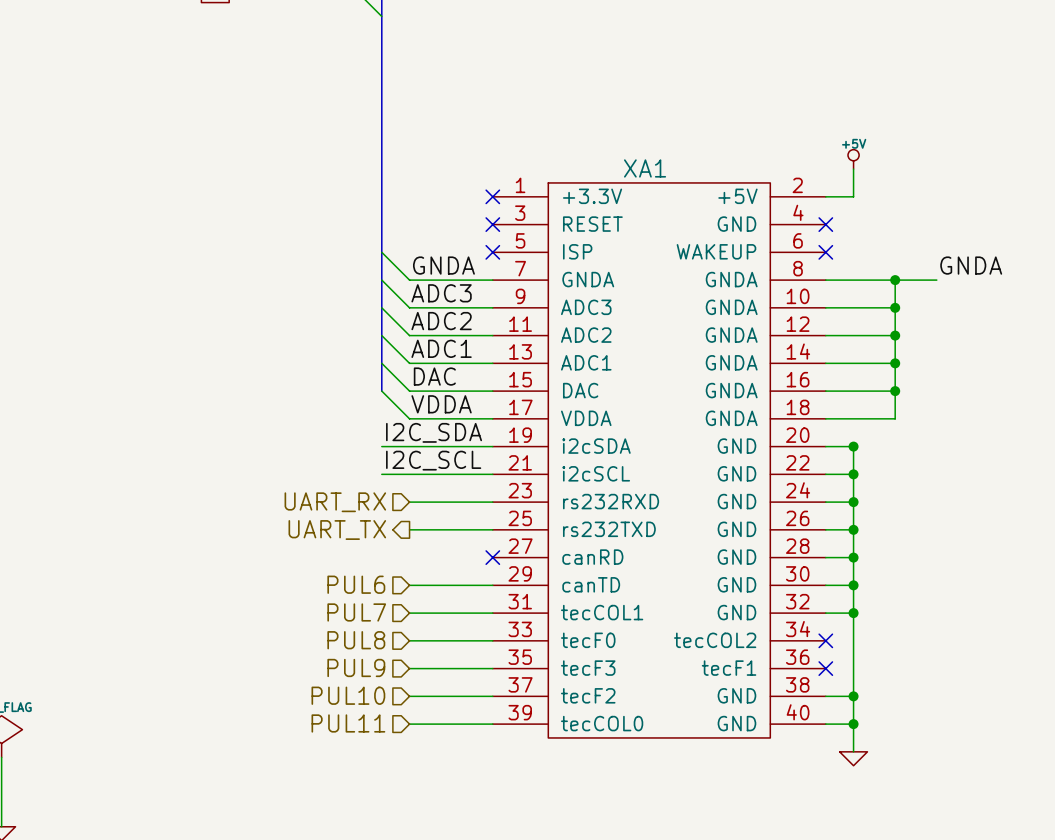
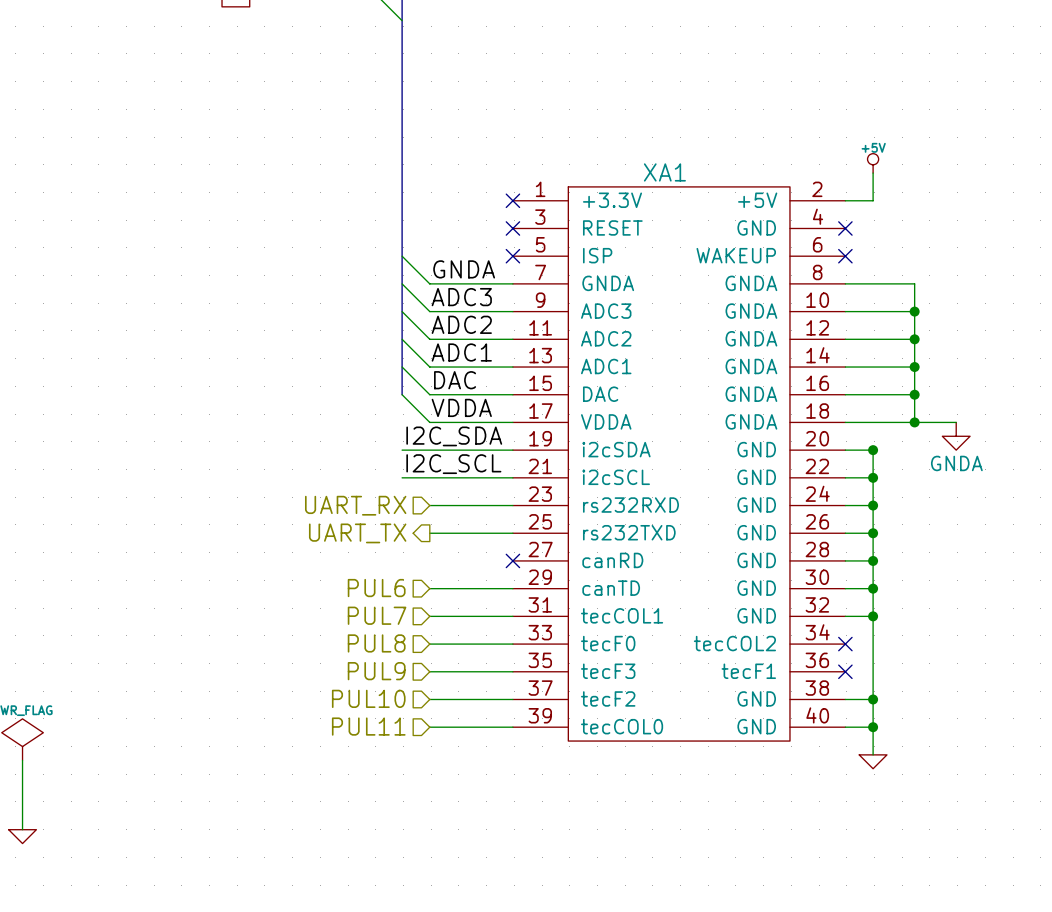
label: GNDA (971, 265) -> none
wire: (895, 280) (936, 280) -> (914, 422) (956, 422)
junction: (895, 280) -> none
junction: none -> (914, 422)
power symbol: none -> GNDA (956, 436)

